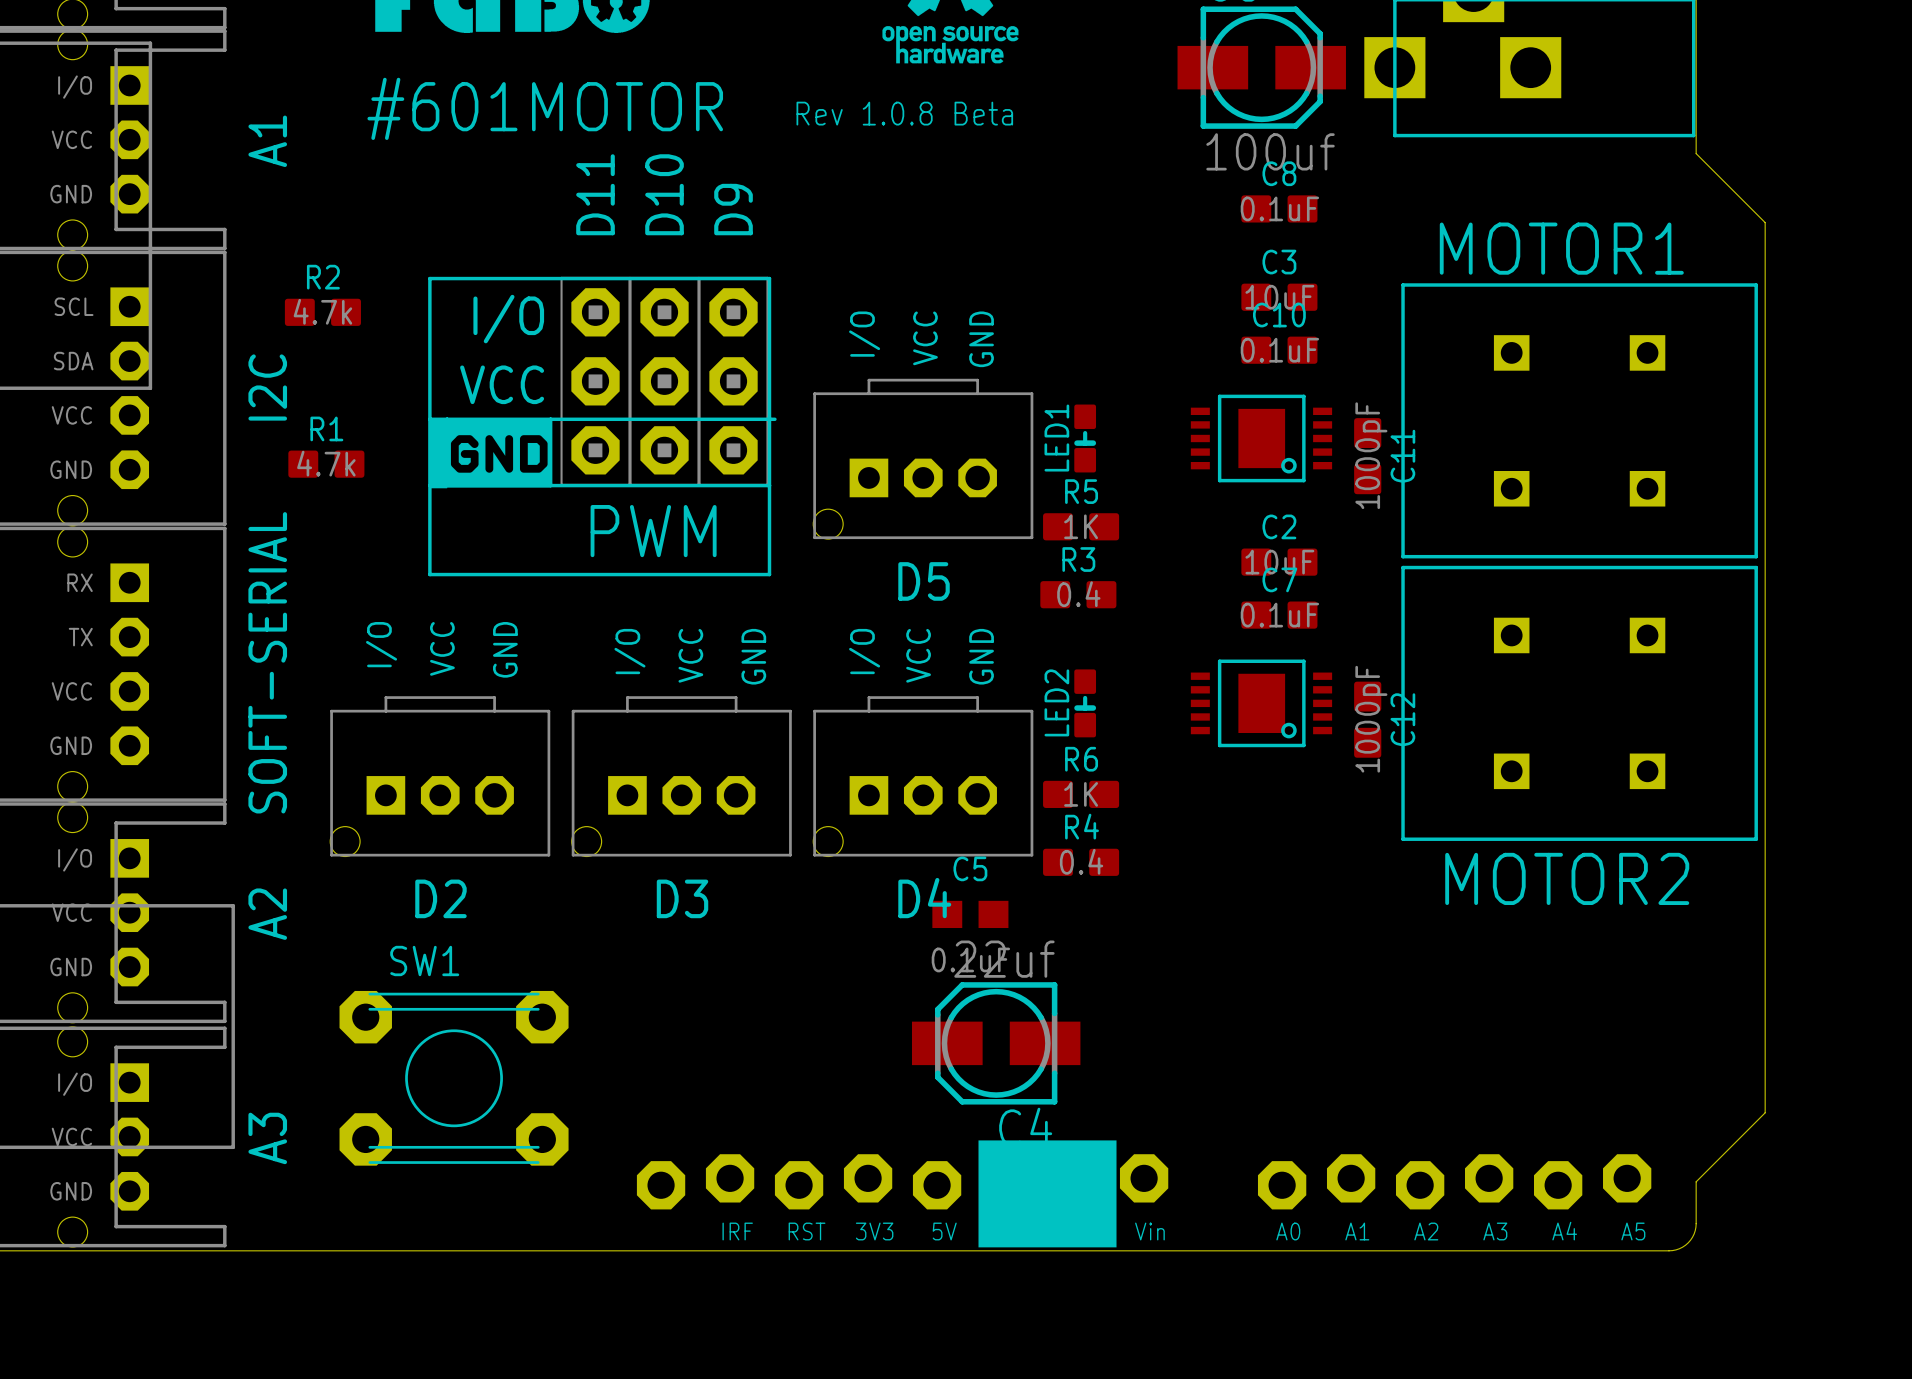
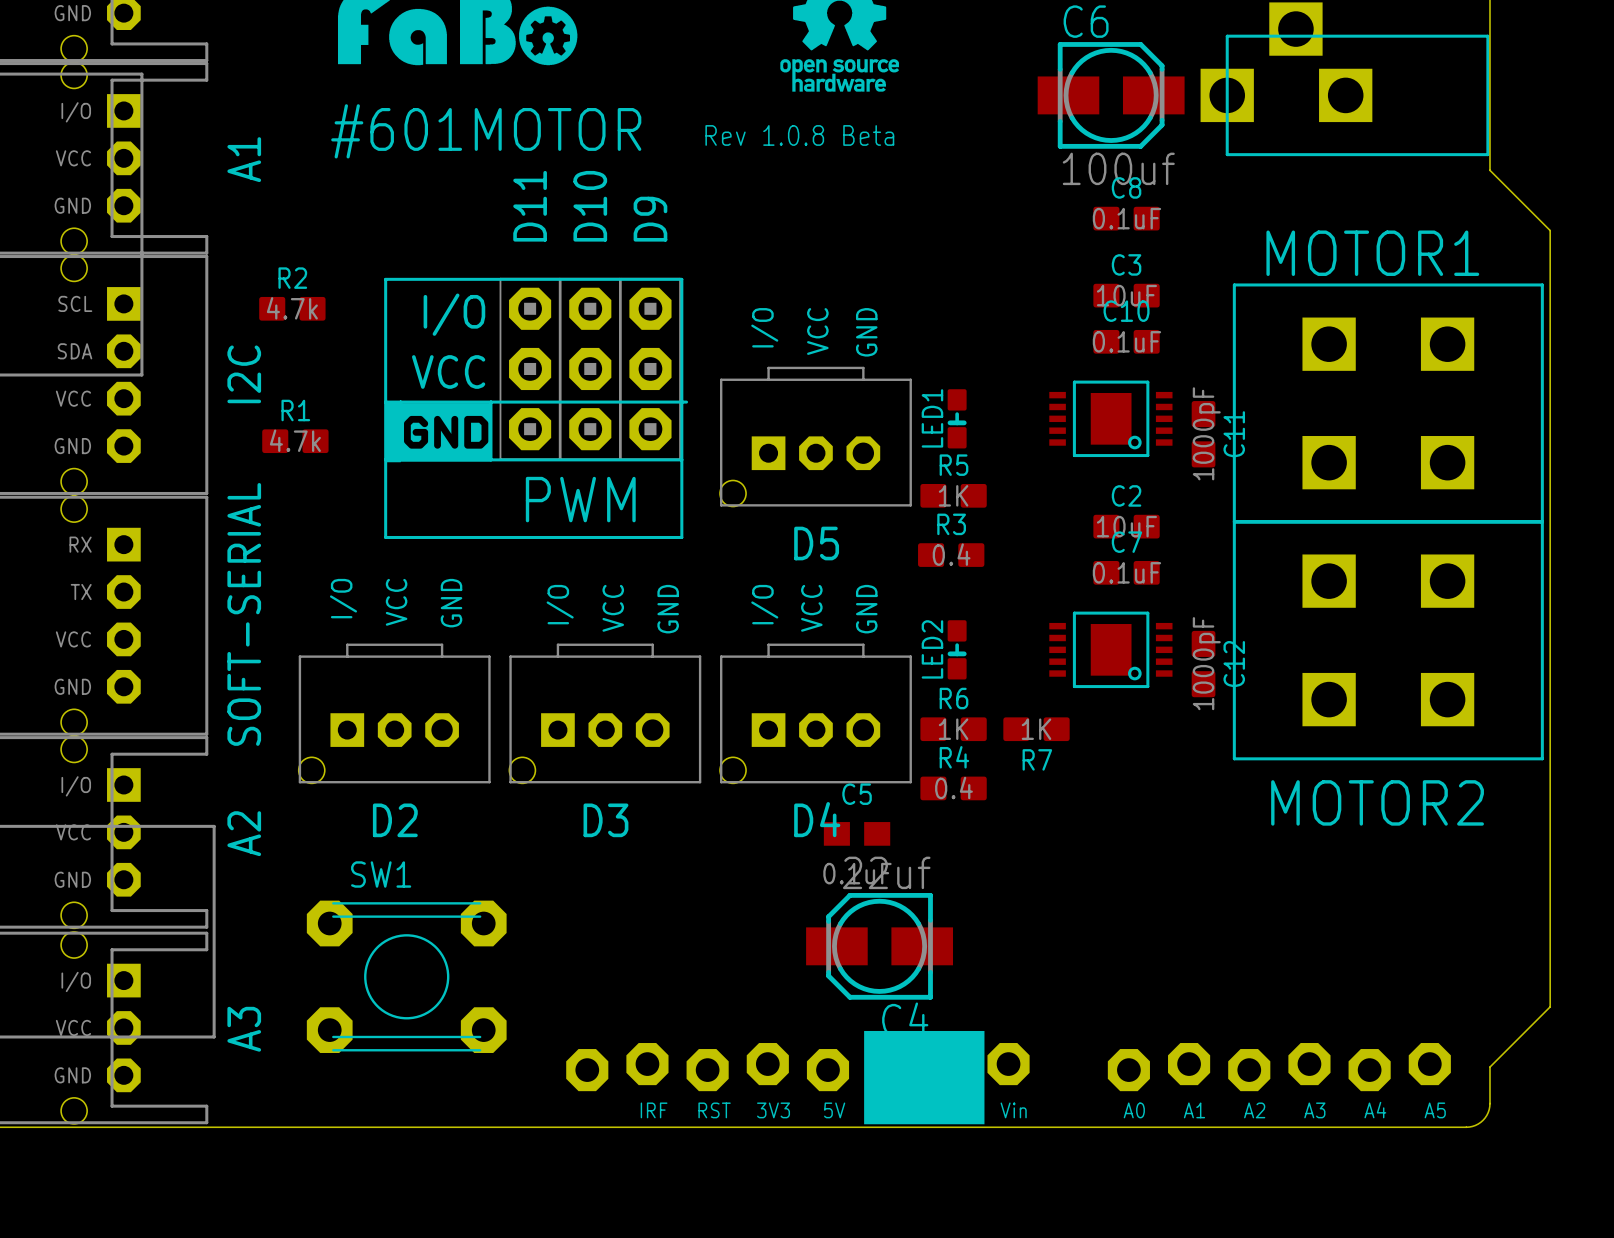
part footprint: [1401, 283, 1758, 559] -> [1232, 283, 1544, 524]
part footprint: [1401, 565, 1758, 841] -> [1232, 520, 1544, 761]
R7: none -> 1K (1036, 729)

